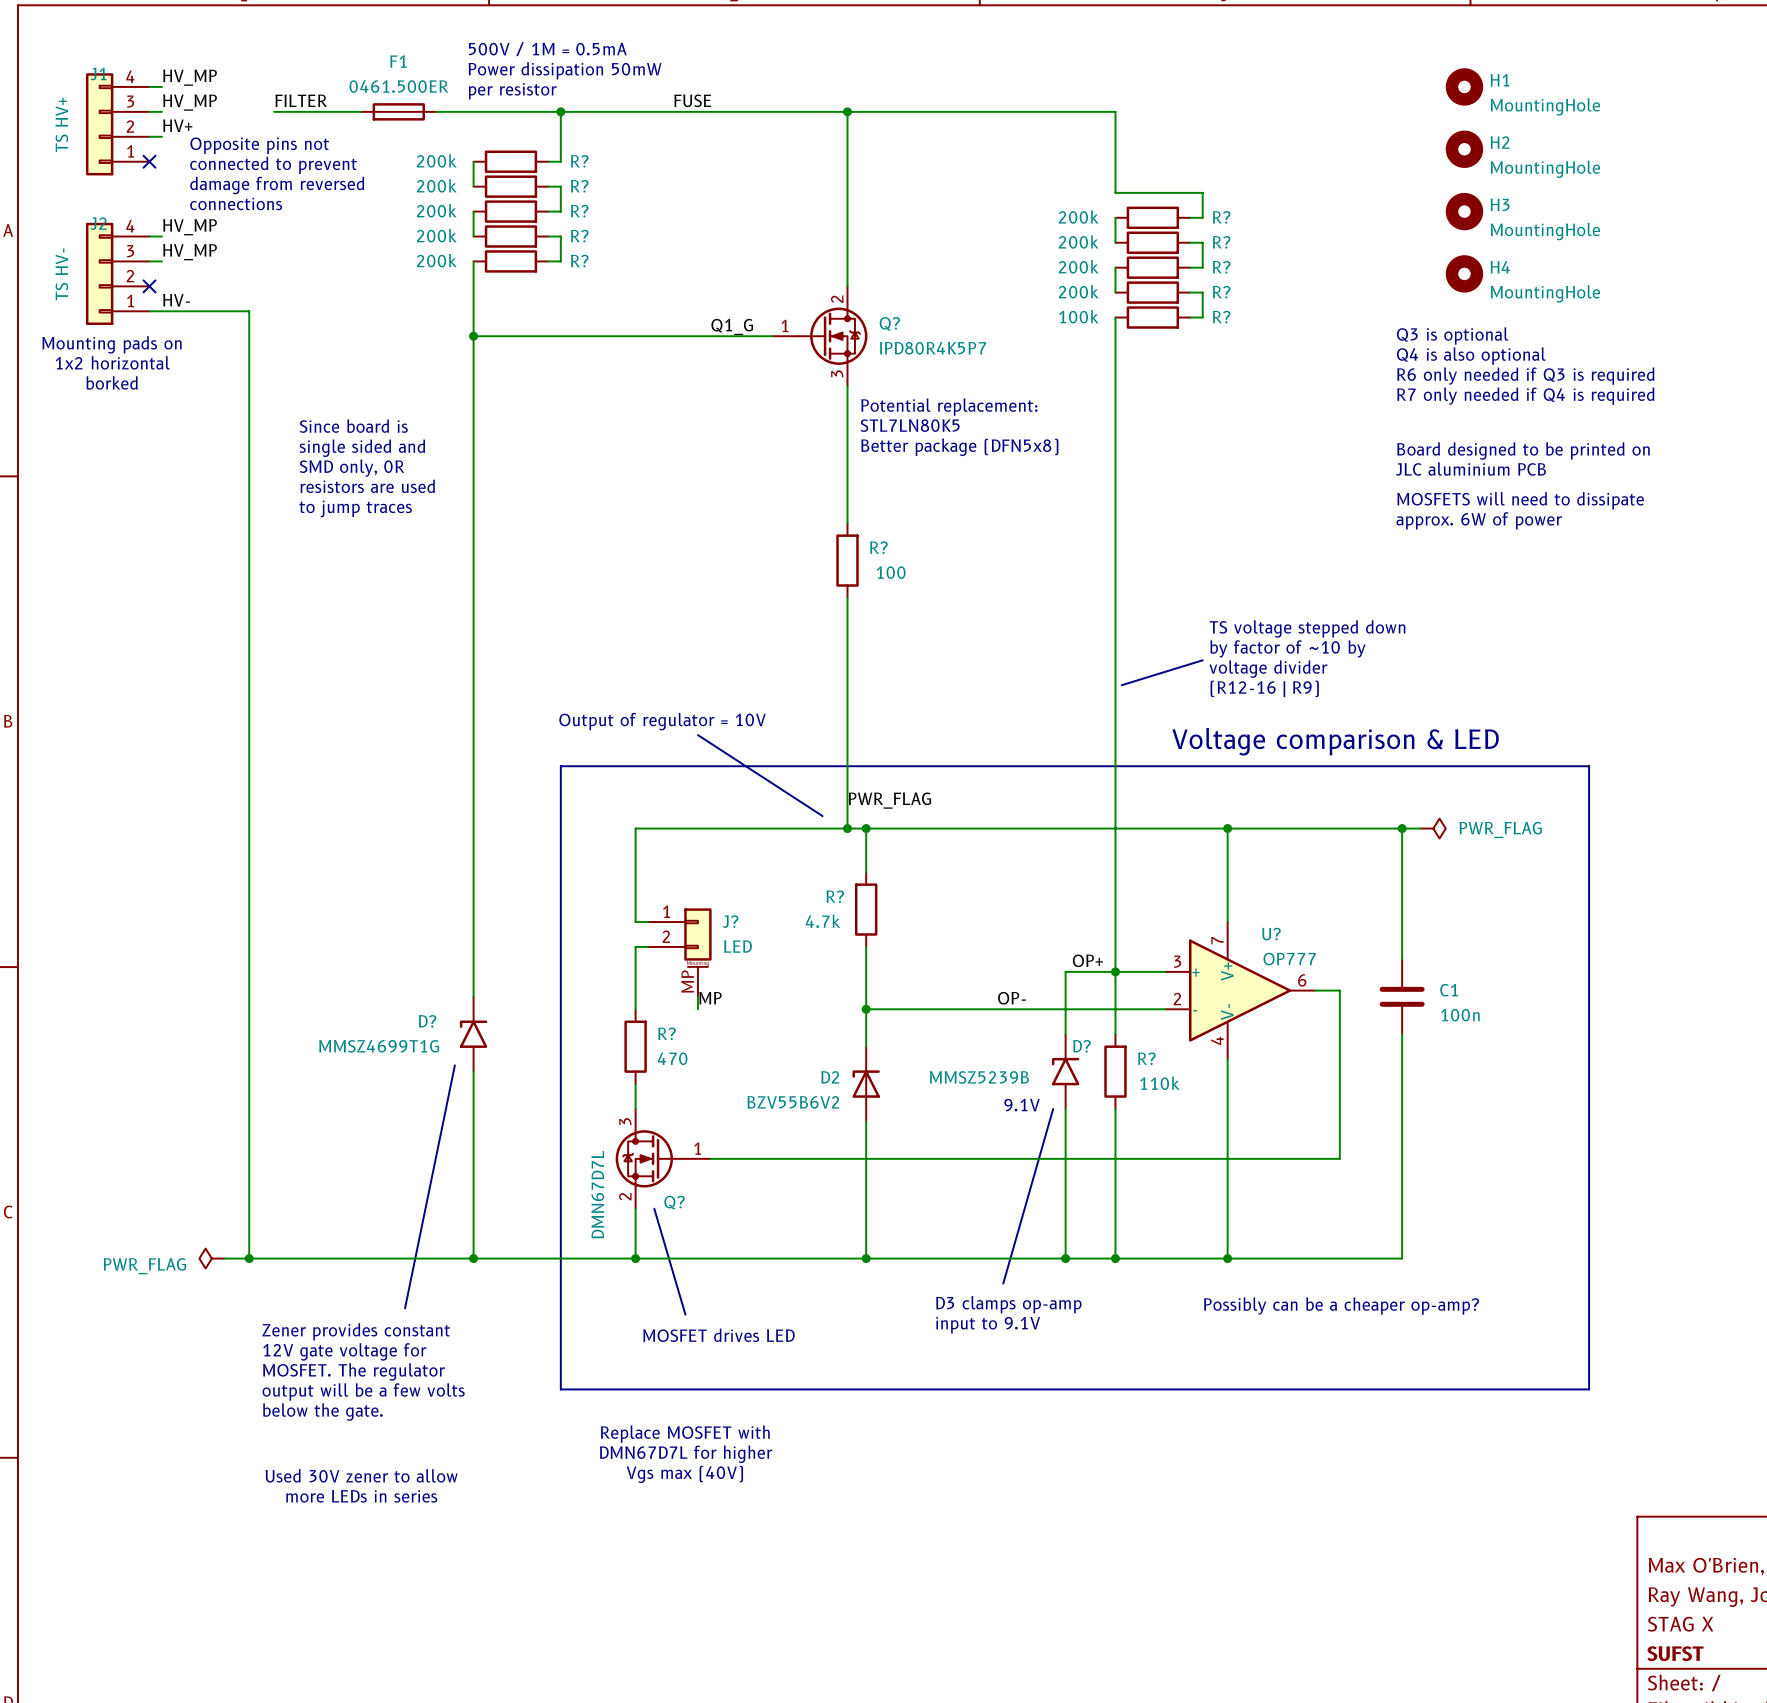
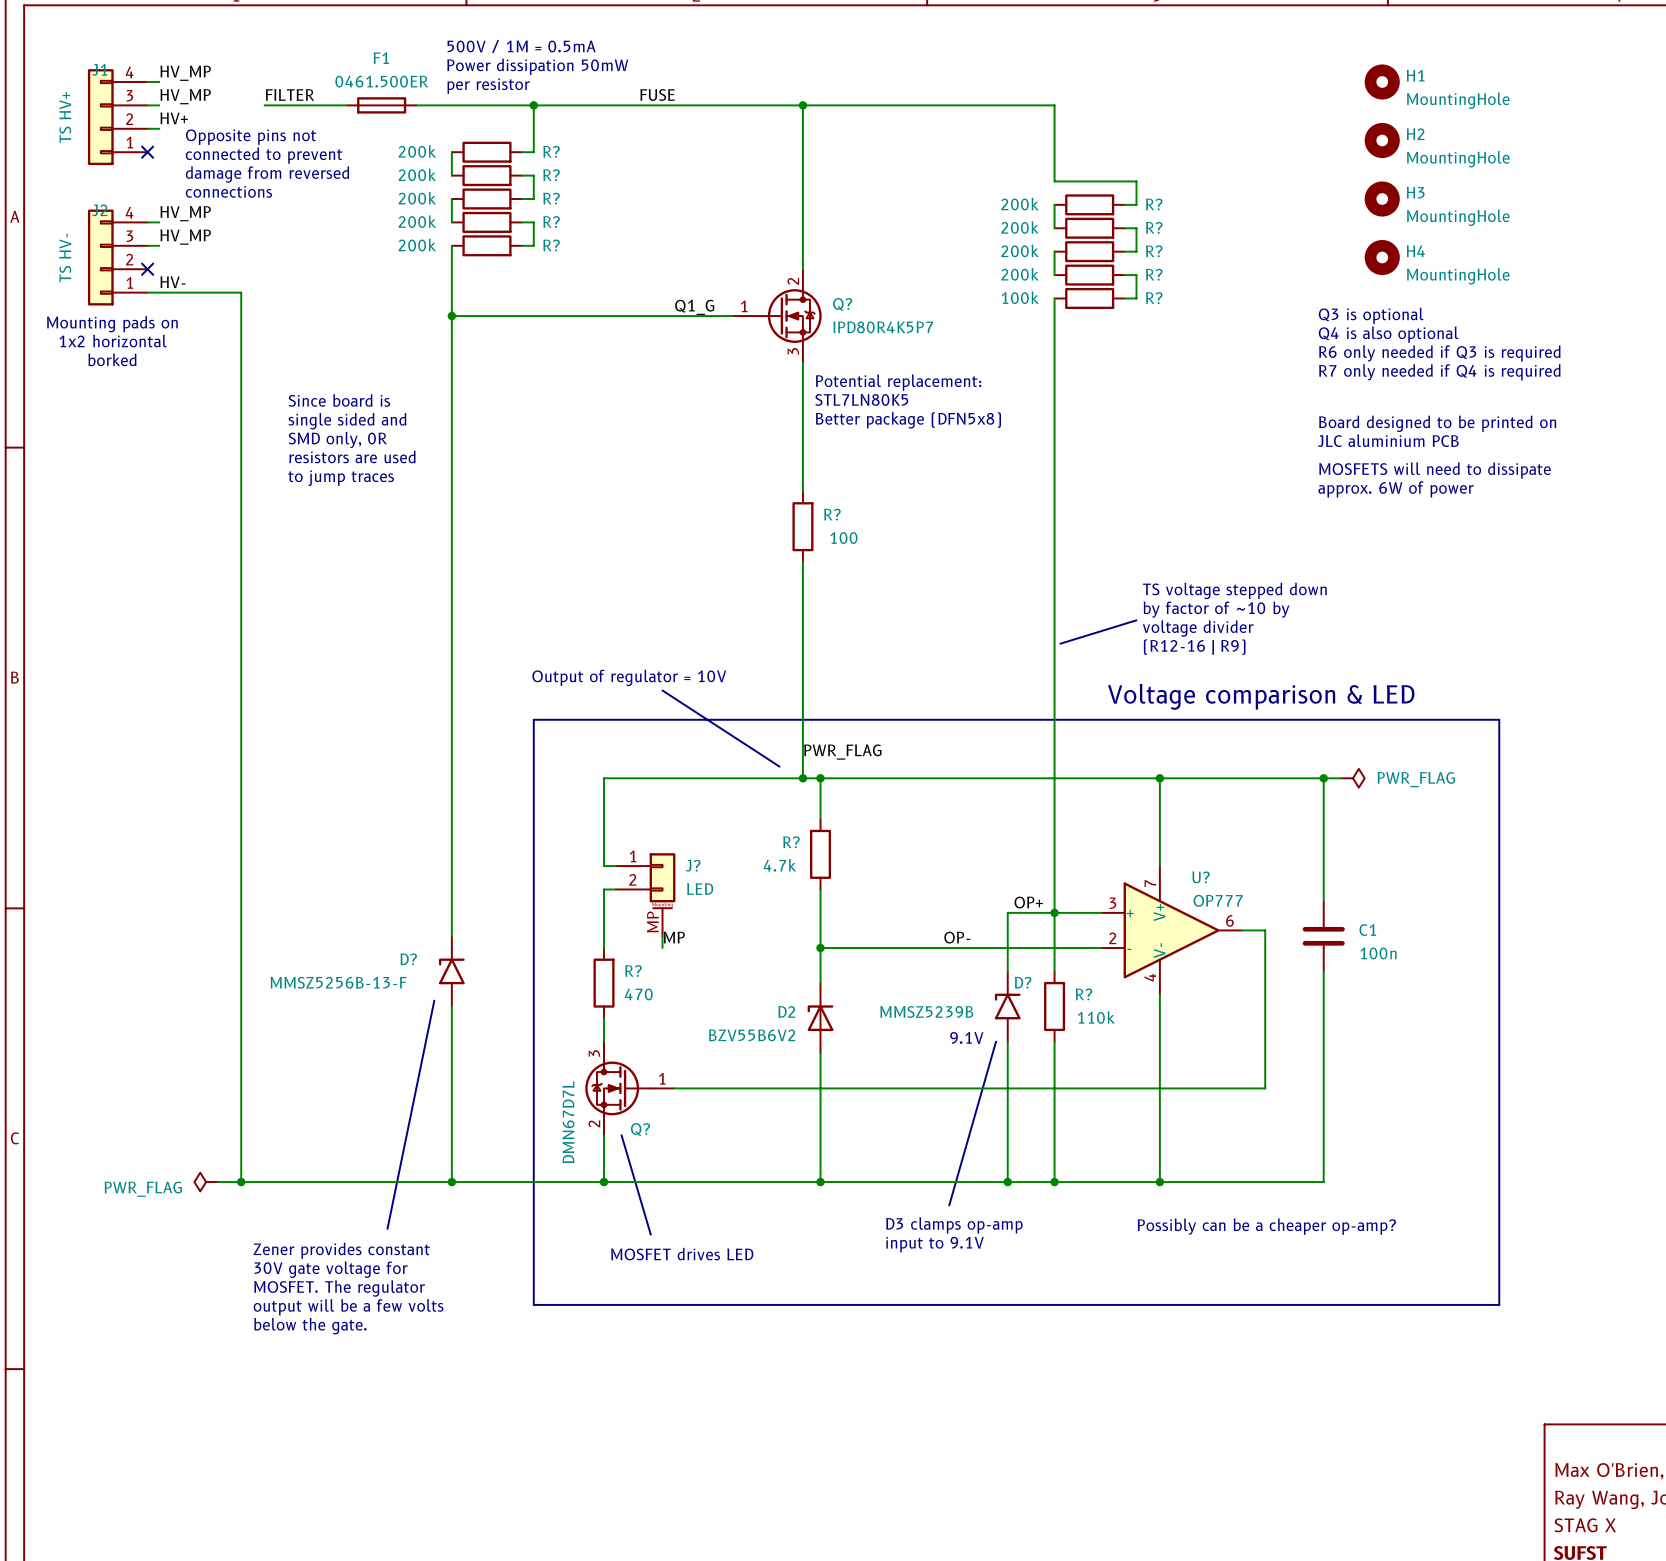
D? value: MMSZ4699T1G (379, 1046) -> MMSZ5256B-13-F (338, 982)
text: 12V gate voltage for (344, 1351) -> 30V gate voltage for (331, 1269)
text: Replace MOSFET with (685, 1434) -> none
text: DMN67D7L for higher (686, 1454) -> none
text: Vgs max (40V) (684, 1474) -> none
text: Used 30V zener to allow (361, 1475) -> none
text: more LEDs in series (361, 1496) -> none

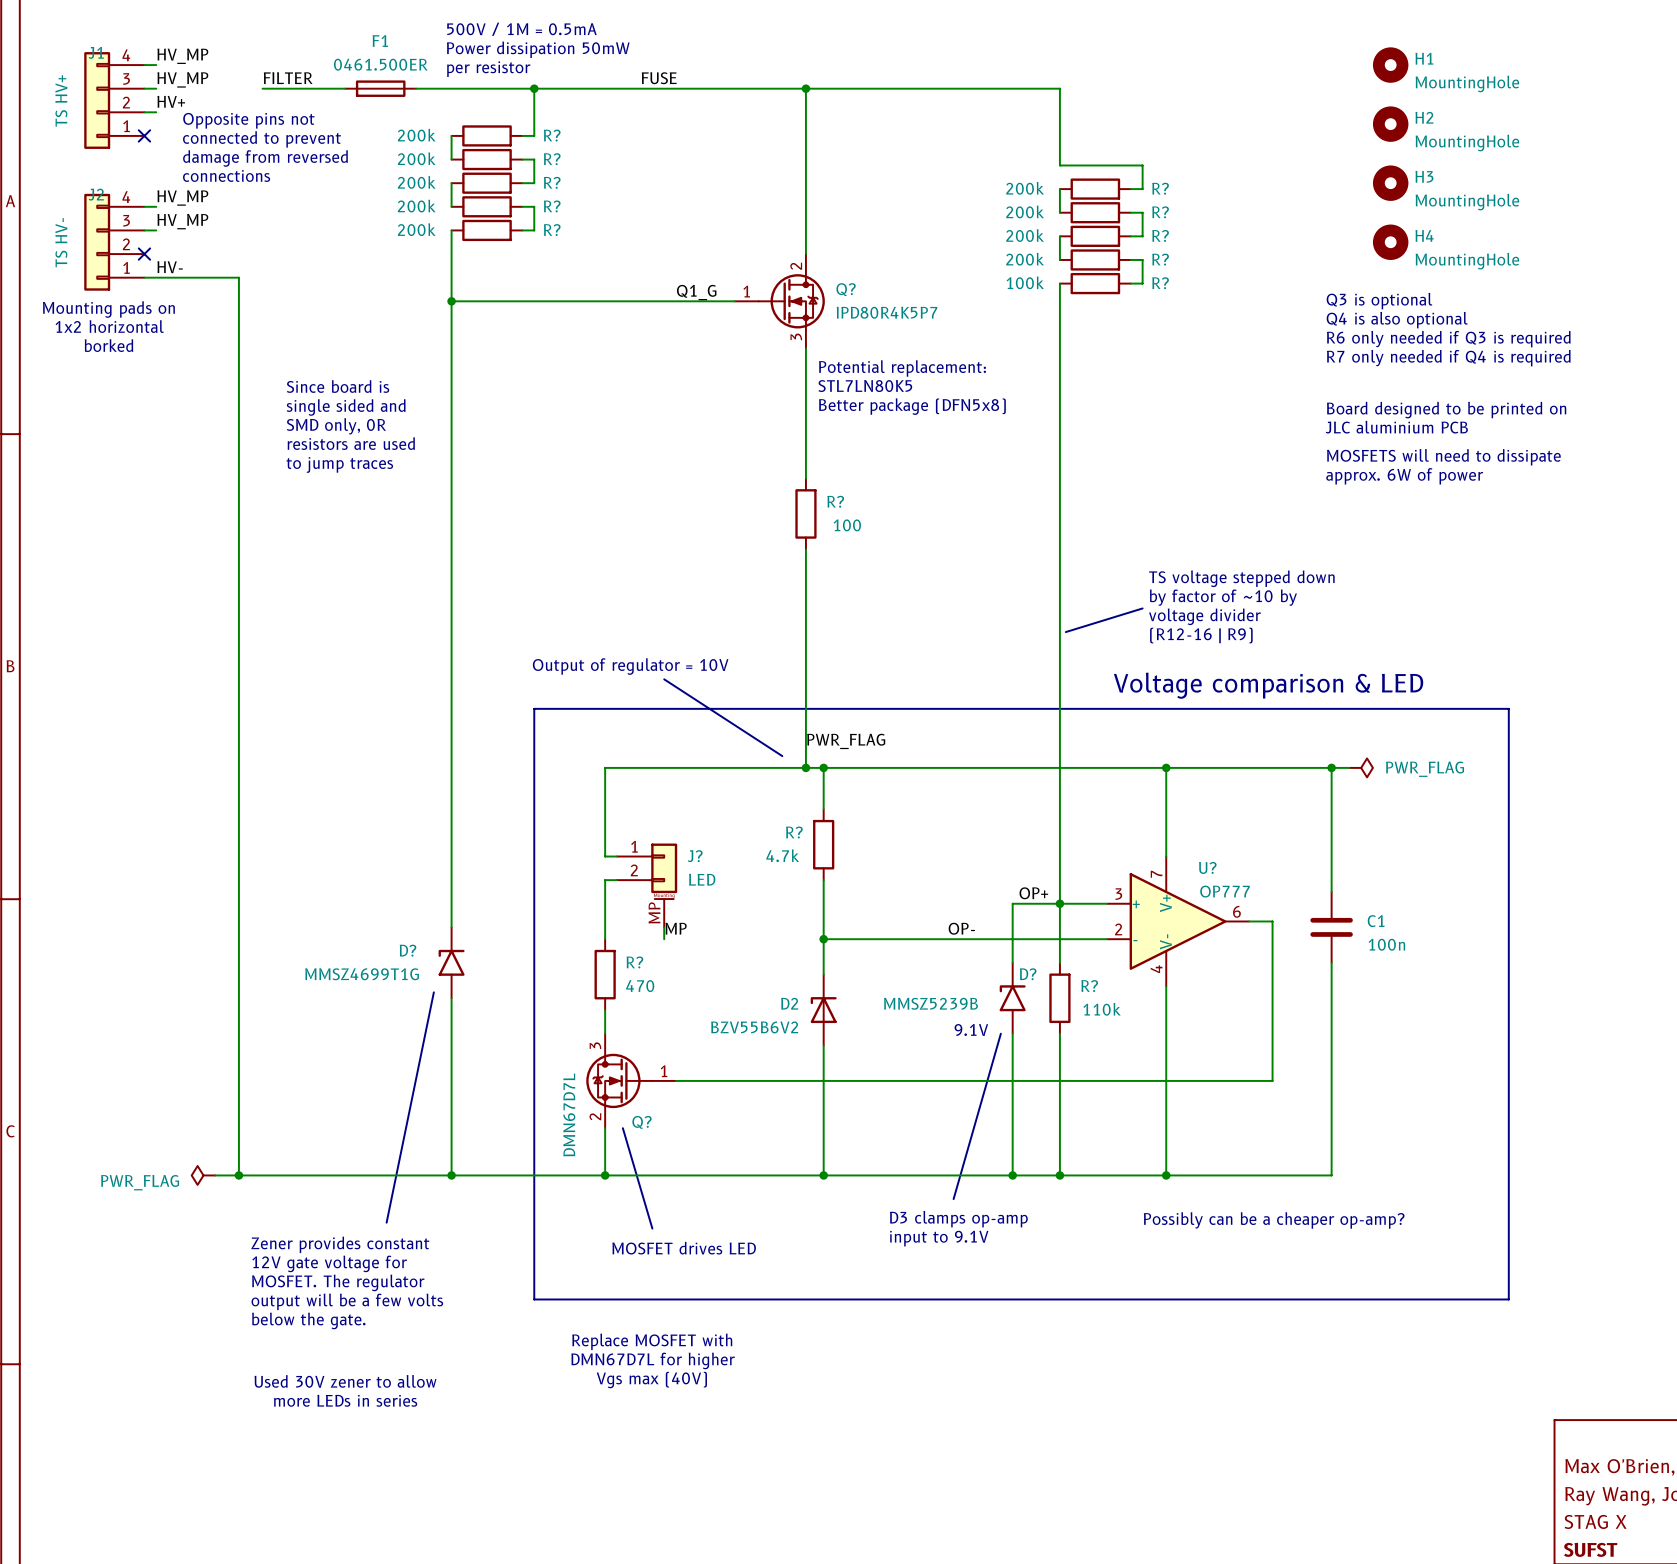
D? value: MMSZ5256B-13-F (338, 982) -> MMSZ4699T1G (362, 974)
text: 30V gate voltage for (331, 1269) -> 12V gate voltage for (329, 1263)
text: none -> Replace MOSFET with (652, 1341)
text: none -> DMN67D7L for higher (653, 1360)
text: none -> Vgs max (40V) (651, 1380)
text: none -> Used 30V zener to allow (345, 1381)
text: none -> more LEDs in series (345, 1400)

